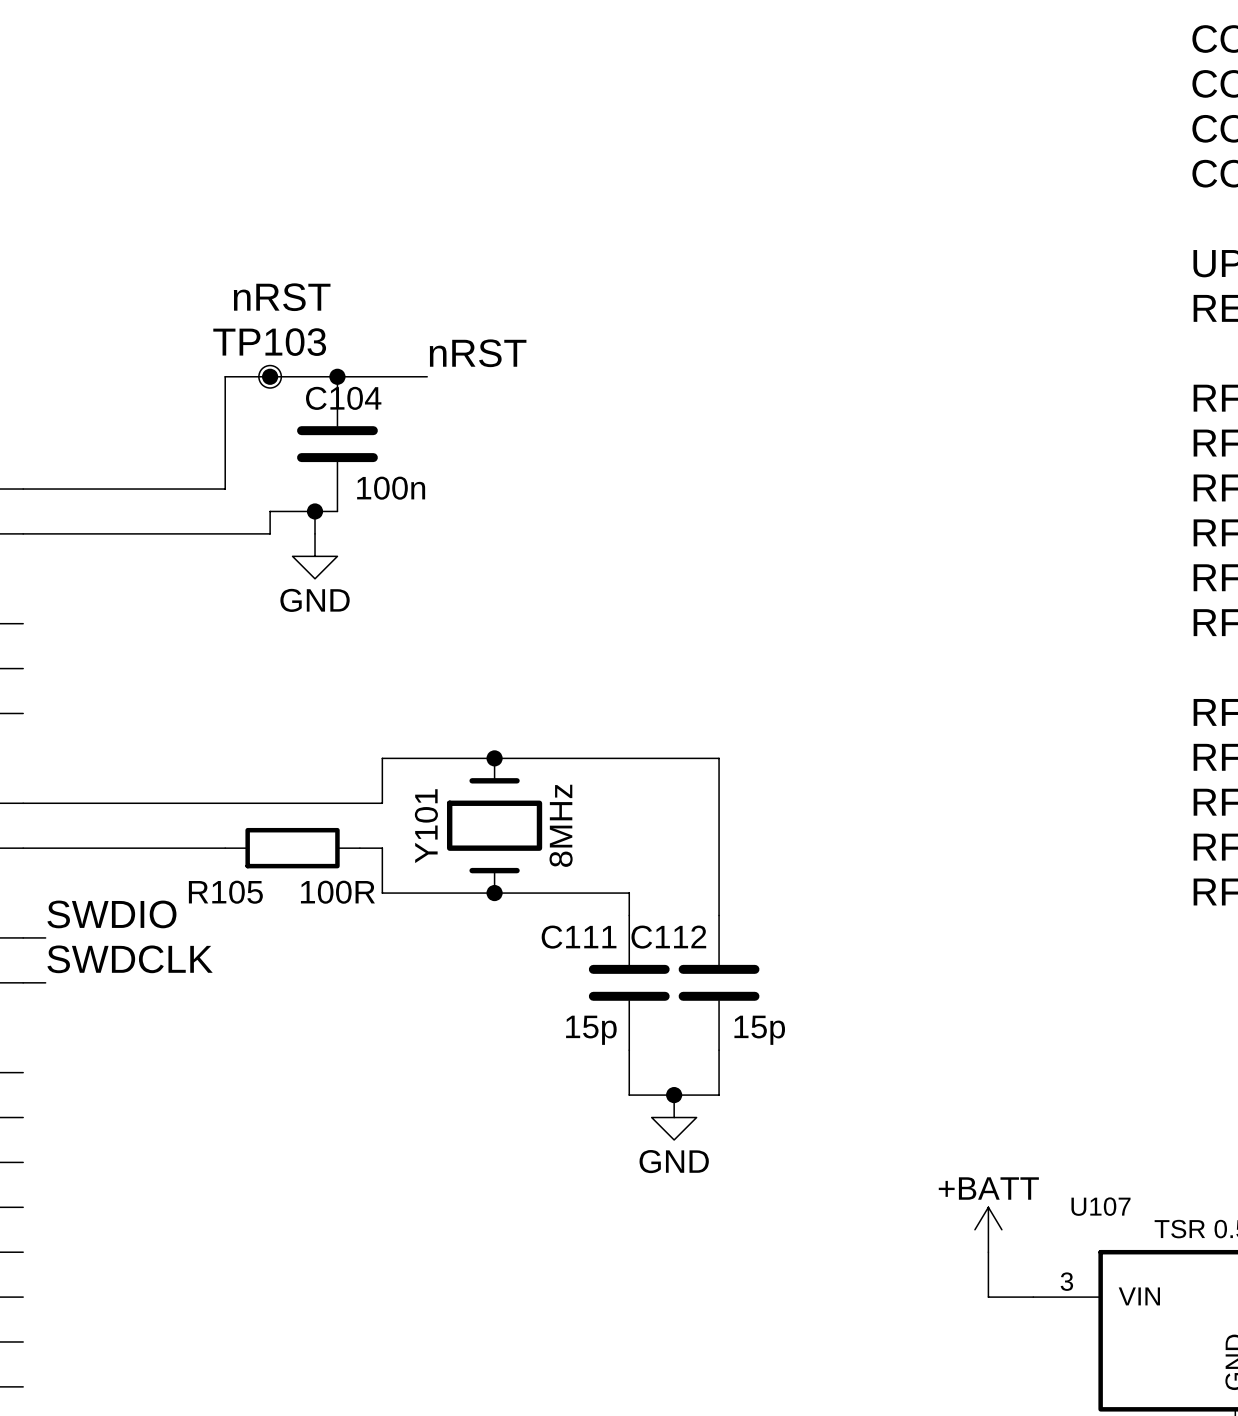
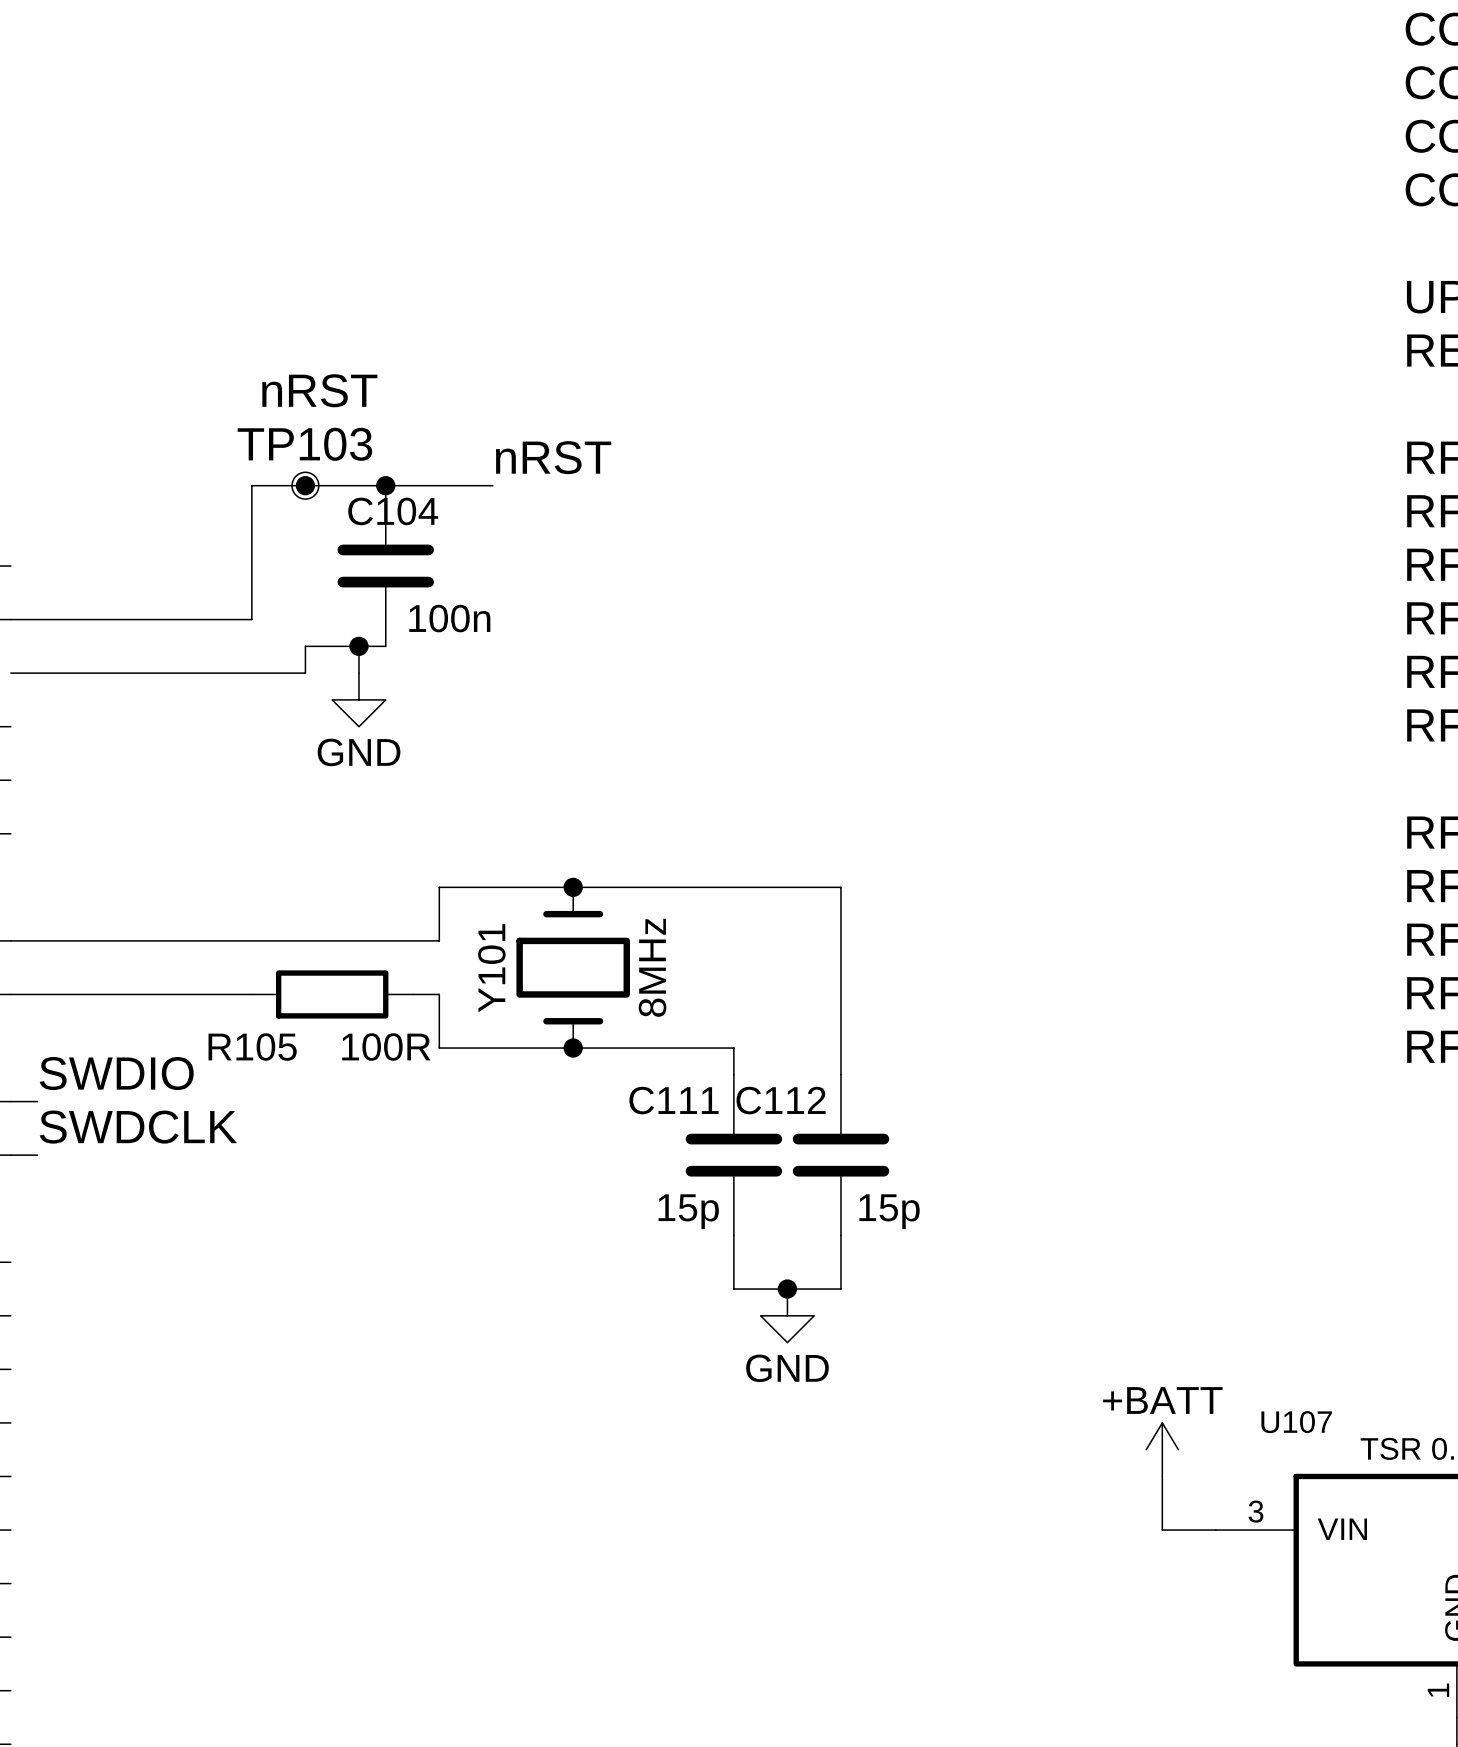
label position: nRST (478, 353) -> nRST (553, 457)
TP103 position: (270, 376) -> (305, 485)
junction: (270, 376) -> none
junction: (337, 376) -> none
wire: (427, 376) (225, 376) (225, 421) -> (492, 485) (251, 485)
junction: none -> (305, 485)
junction: none -> (385, 485)
C104 position: (337, 444) -> (385, 566)
wire: (23, 489) (225, 489) -> none
wire: (315, 511) (315, 533) -> (358, 646) (358, 673)
junction position: (315, 511) -> (358, 646)
wire: (337, 511) (270, 511) (270, 533) (225, 533) -> (251, 566) (251, 619)
power symbol position: GND (315, 556) -> GND (358, 699)
wire: none -> (385, 646) (305, 646) (305, 673) (10, 673)

